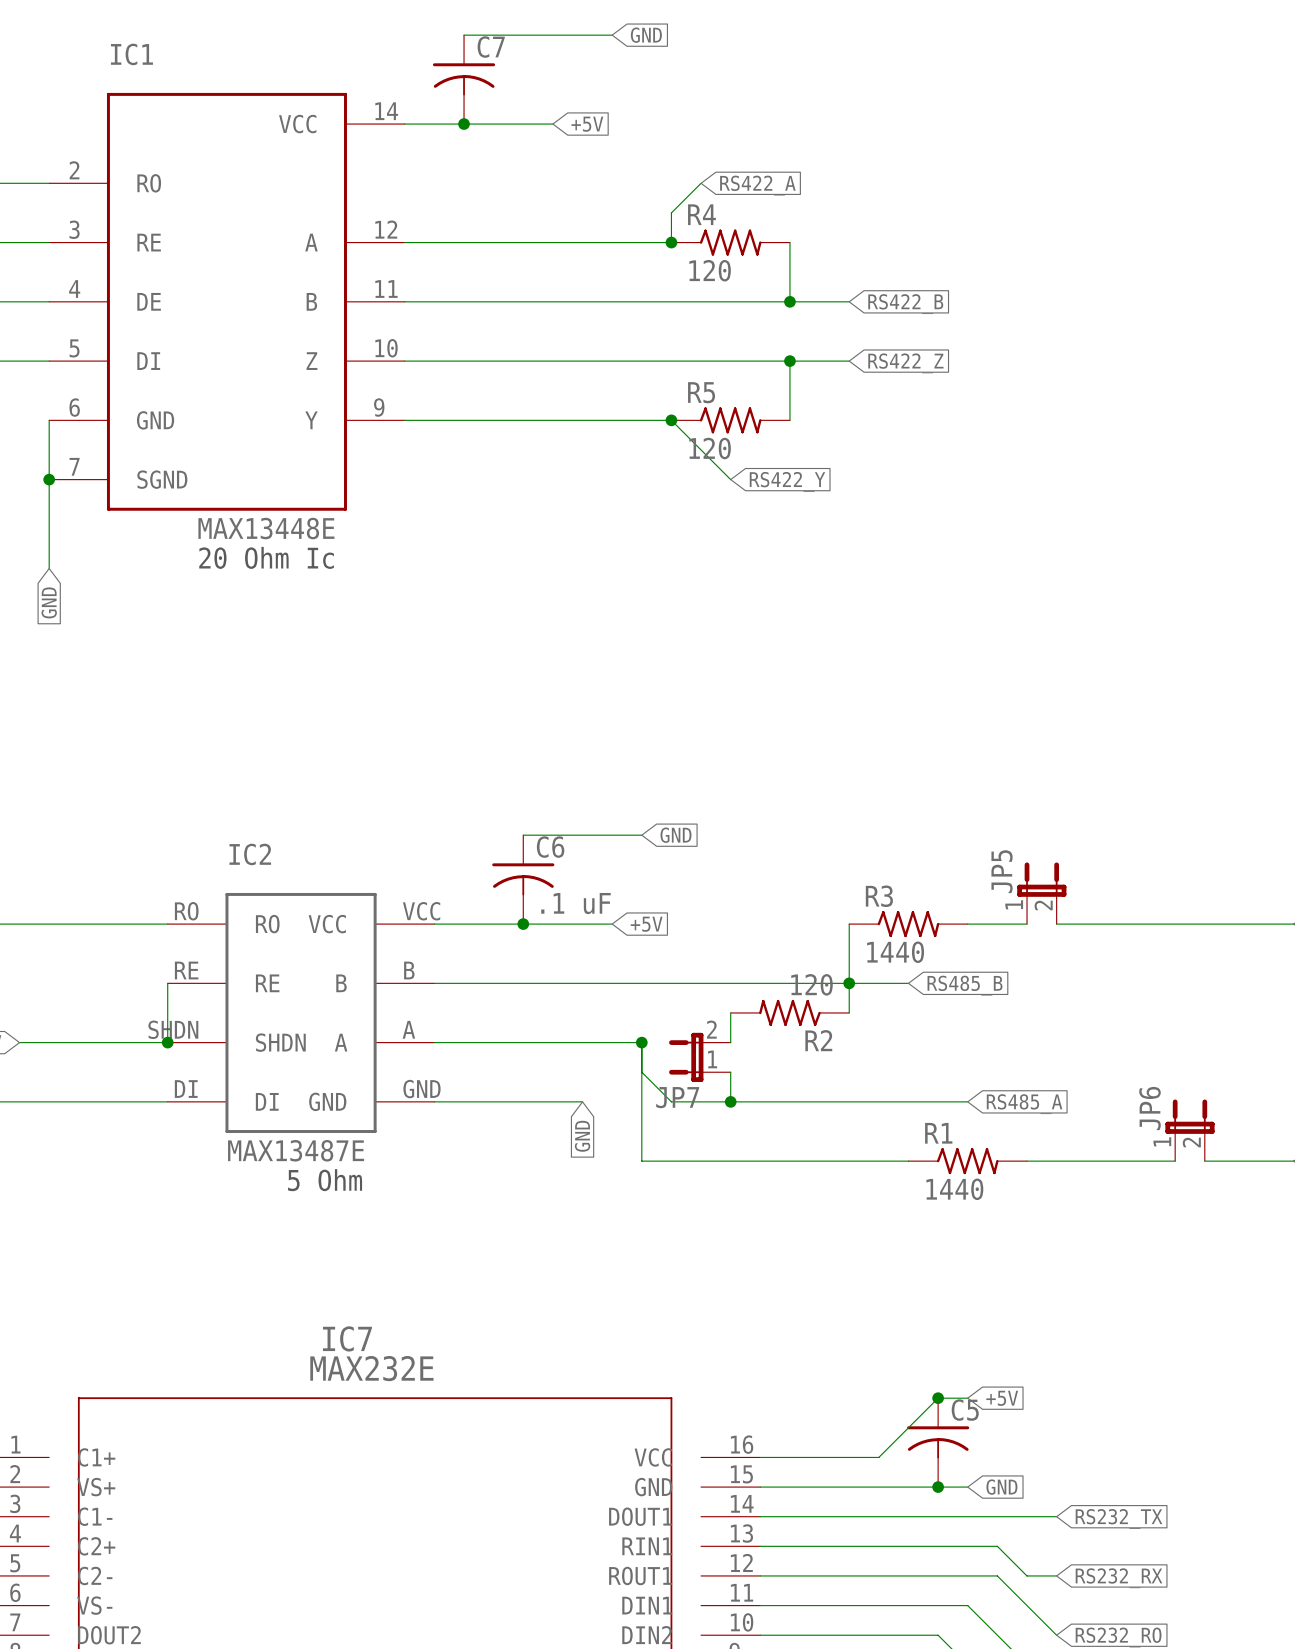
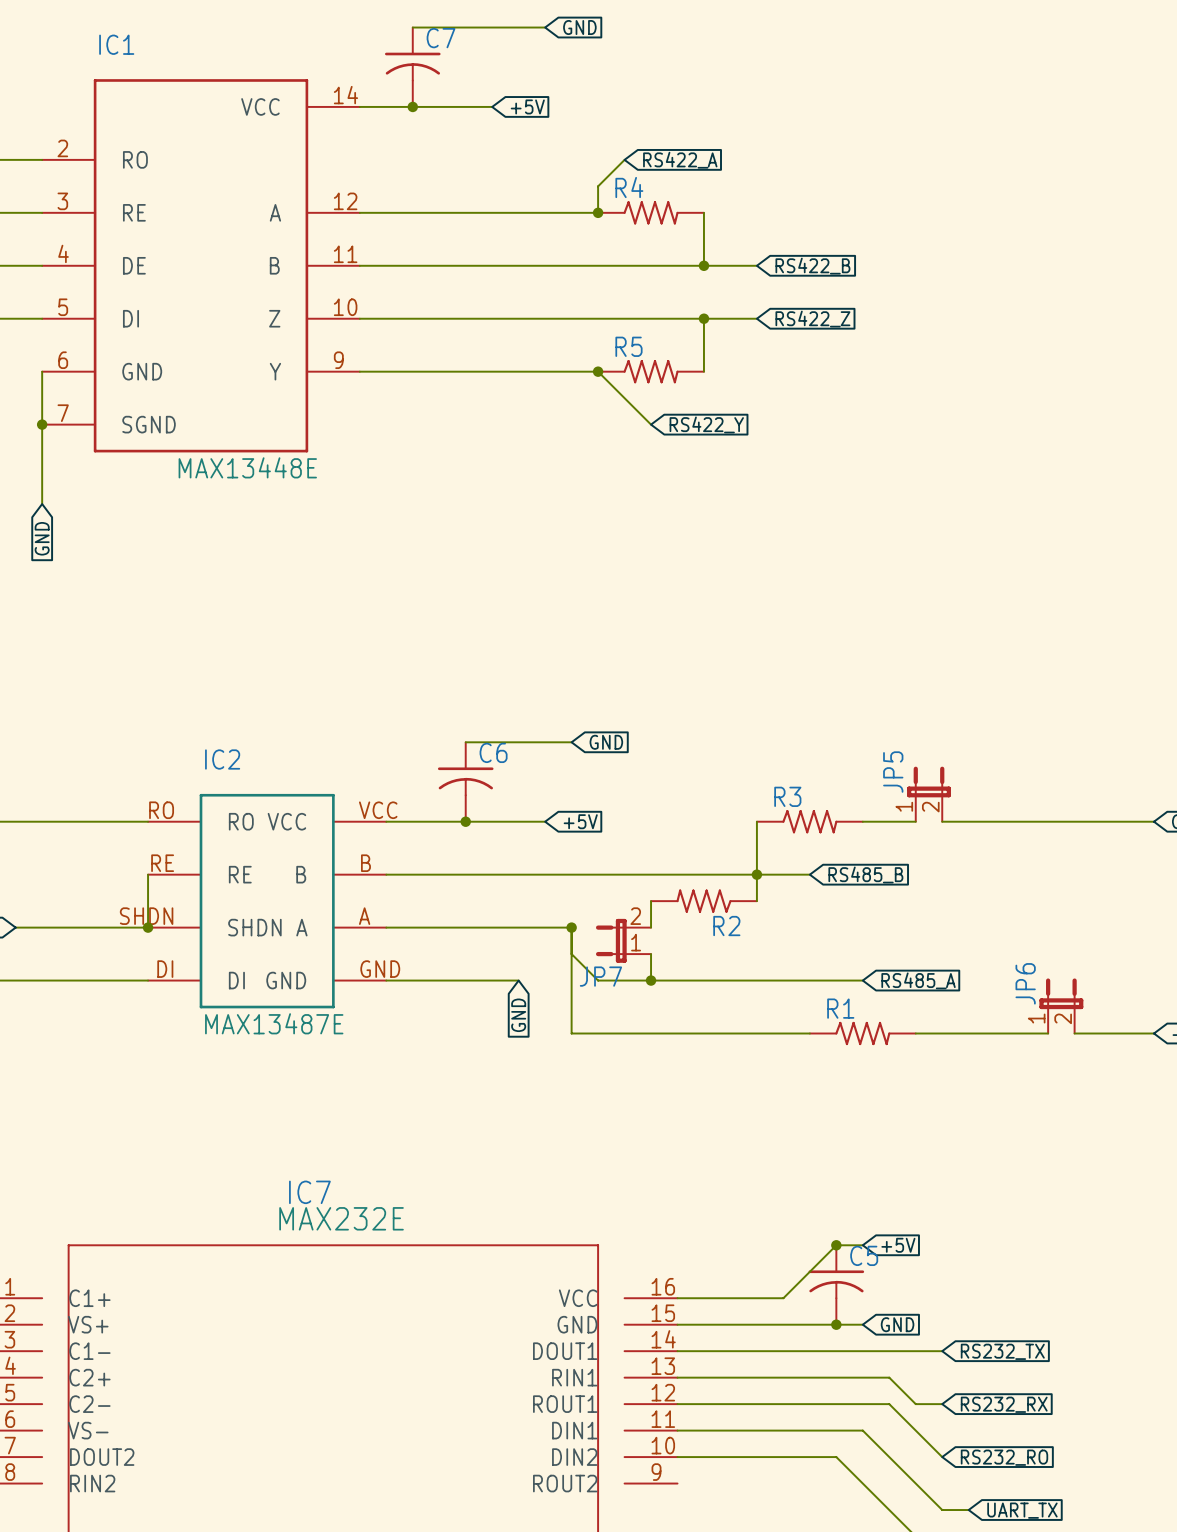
R4 value: 120 (710, 270) -> none
R5 value: 120 (710, 448) -> none
text: 20 Ohm Ic (266, 557) -> none
C6 value: .1 uF (575, 903) -> none
R3 value: 1440 (895, 952) -> none
R2 value: 120 (811, 984) -> none
text: 5 Ohm (325, 1180) -> none
R1 value: 1440 (954, 1189) -> none

